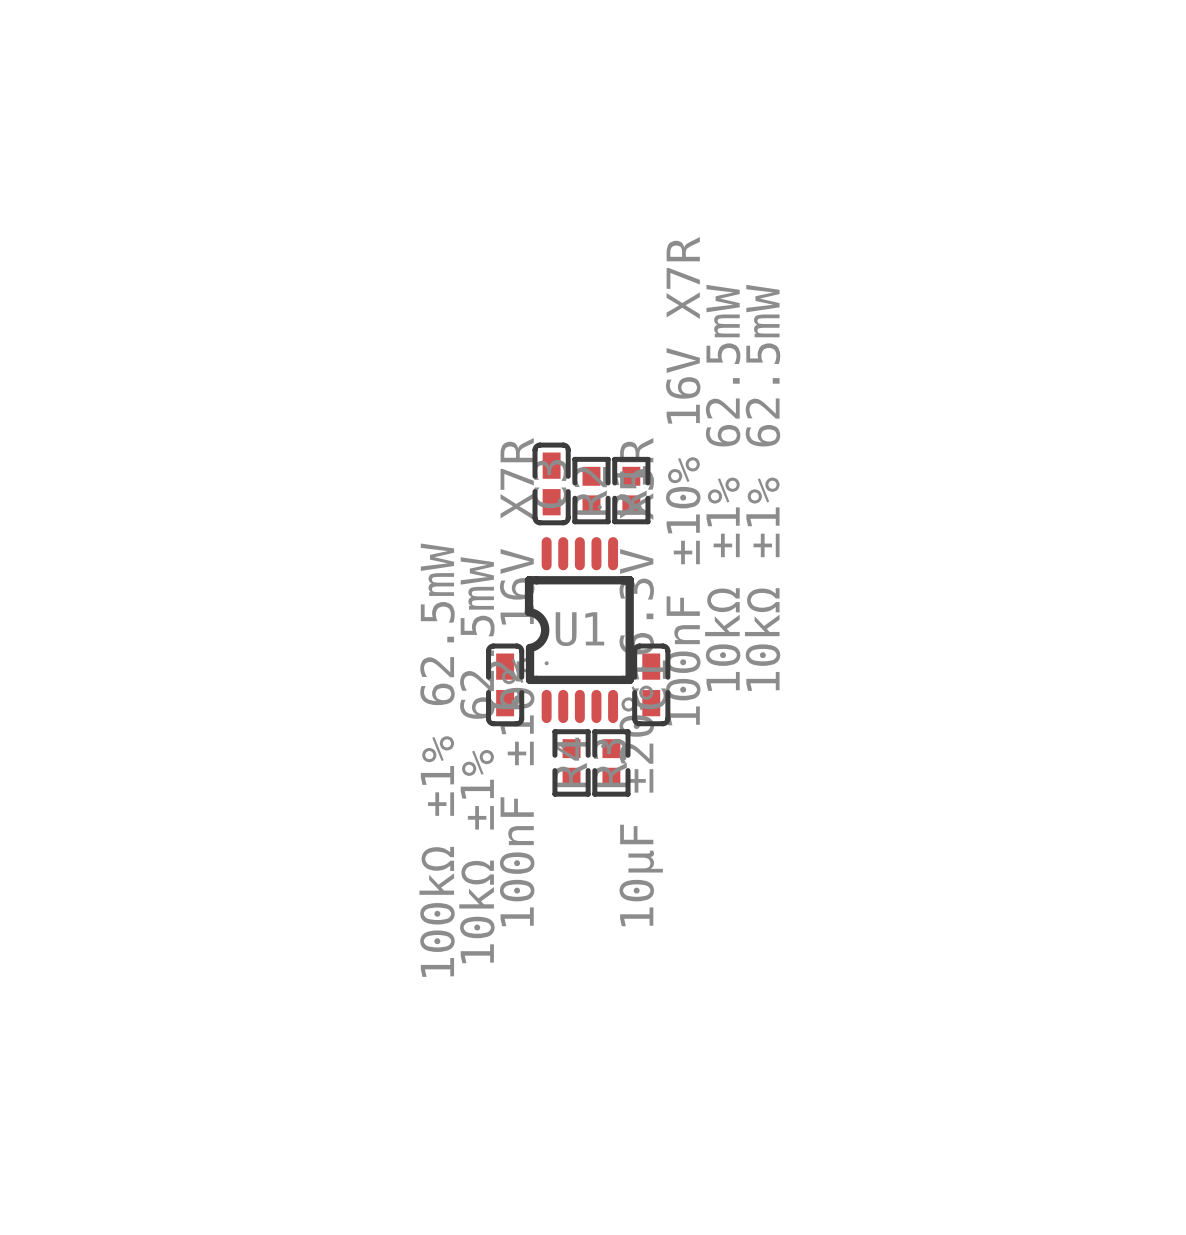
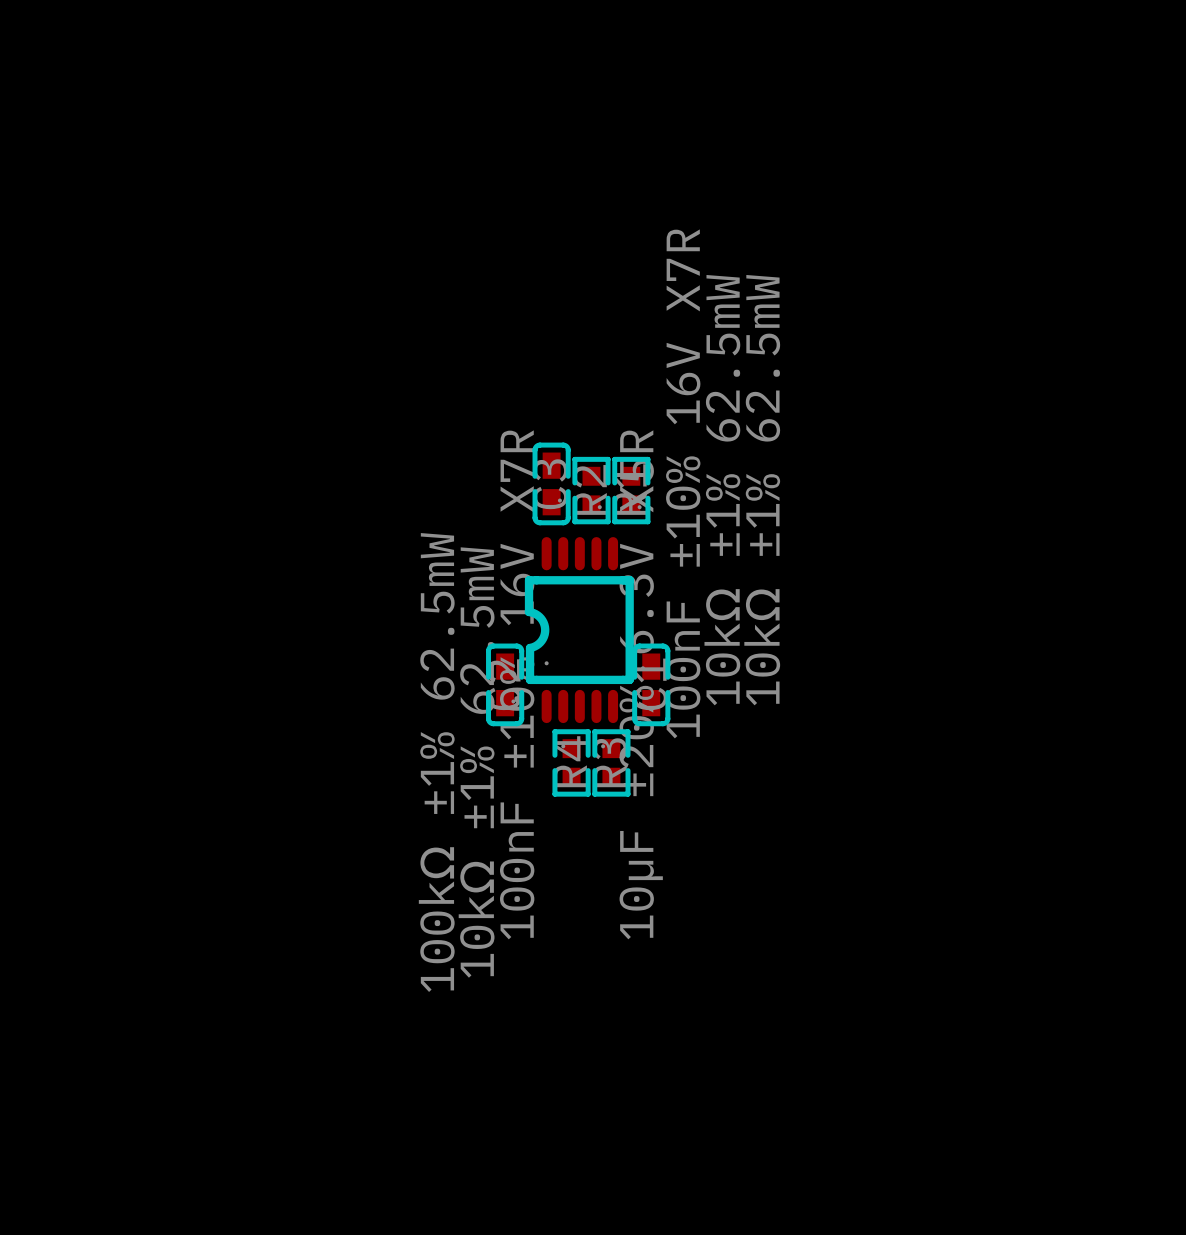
U1 name: U1 (579, 629) -> none

